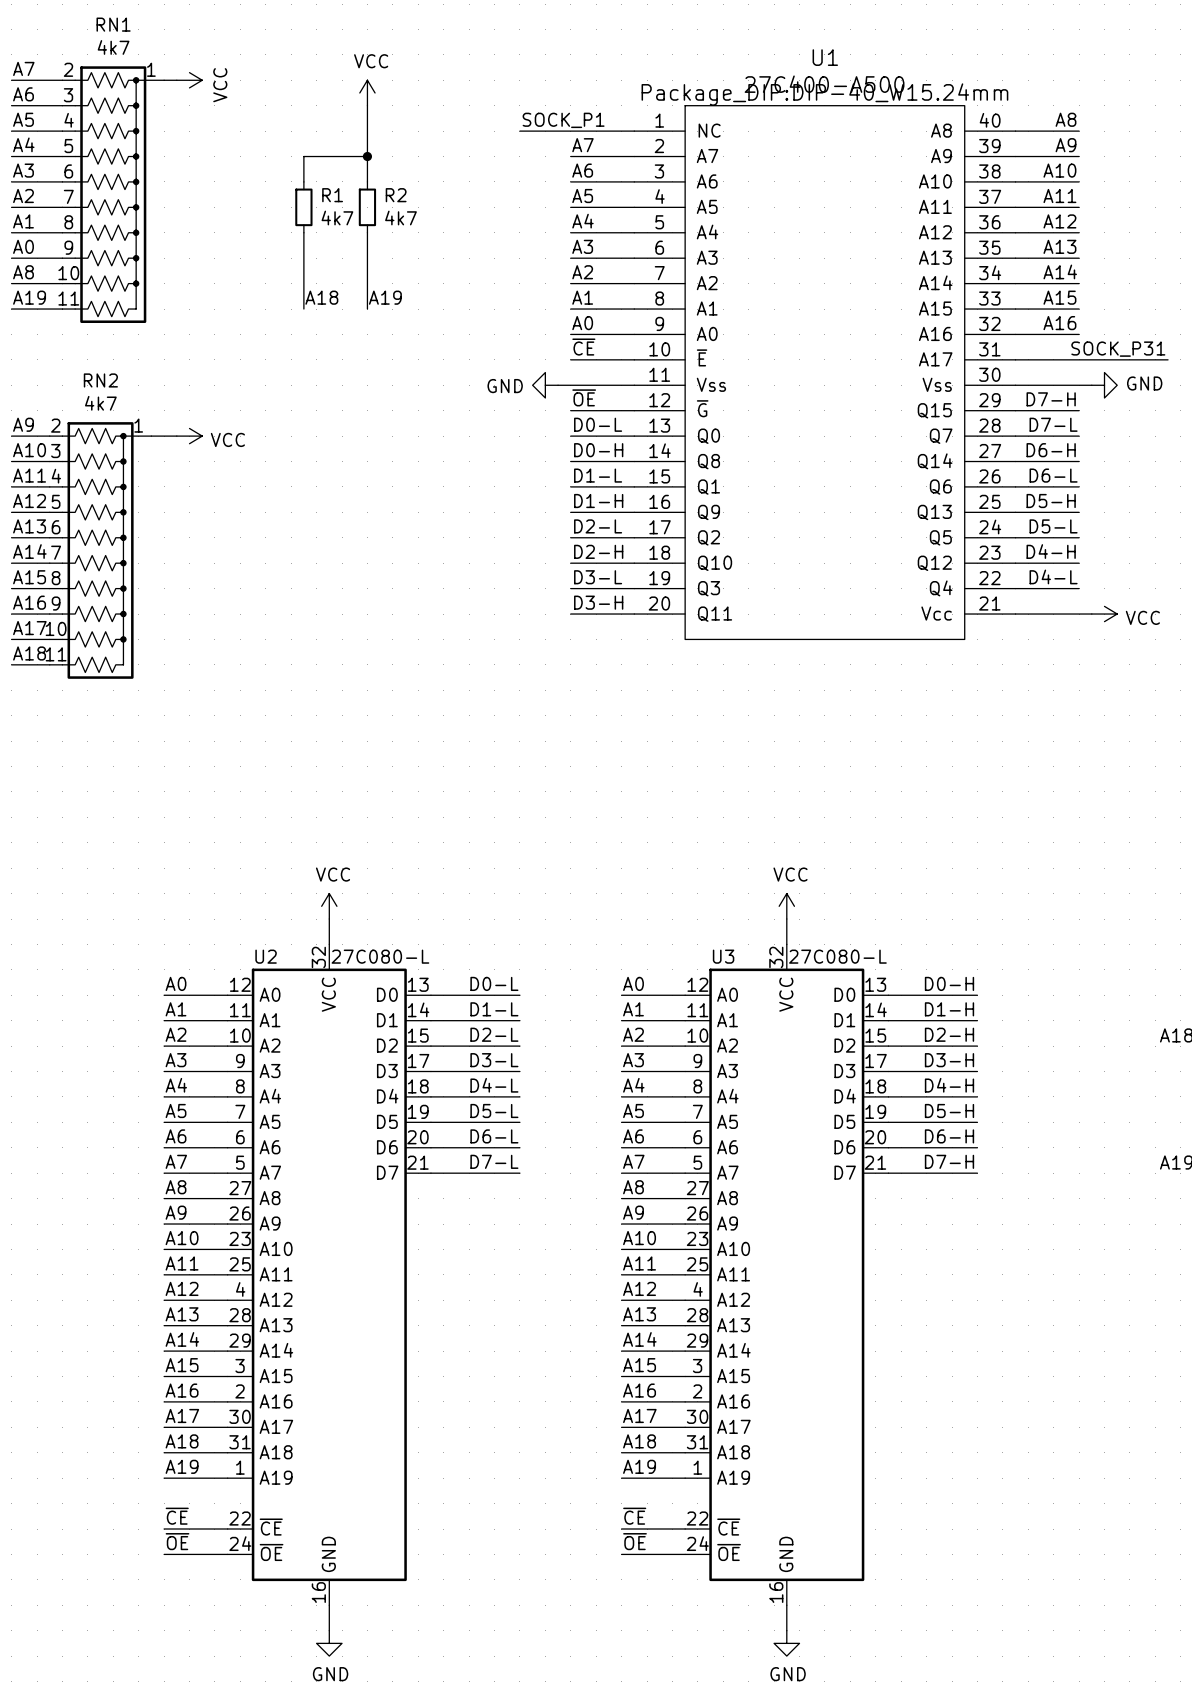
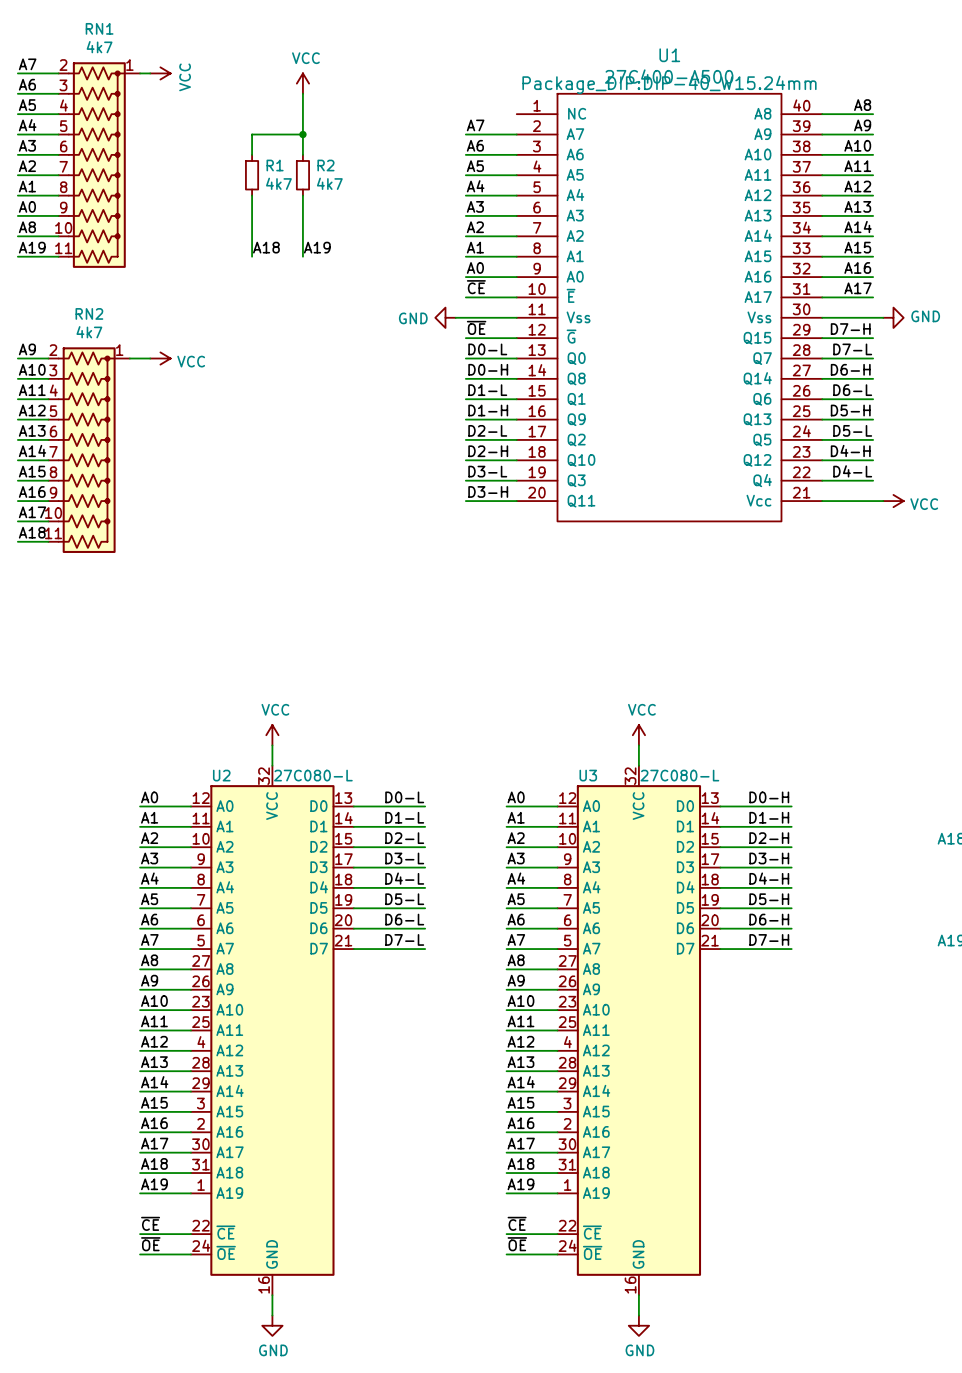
label: SOCK_P1 (563, 120) -> none
wire: (519, 131) (634, 131) -> none
label: none -> A17 (858, 288)
label: SOCK_P31 (1118, 349) -> none
wire: (1079, 359) (1168, 359) -> none

